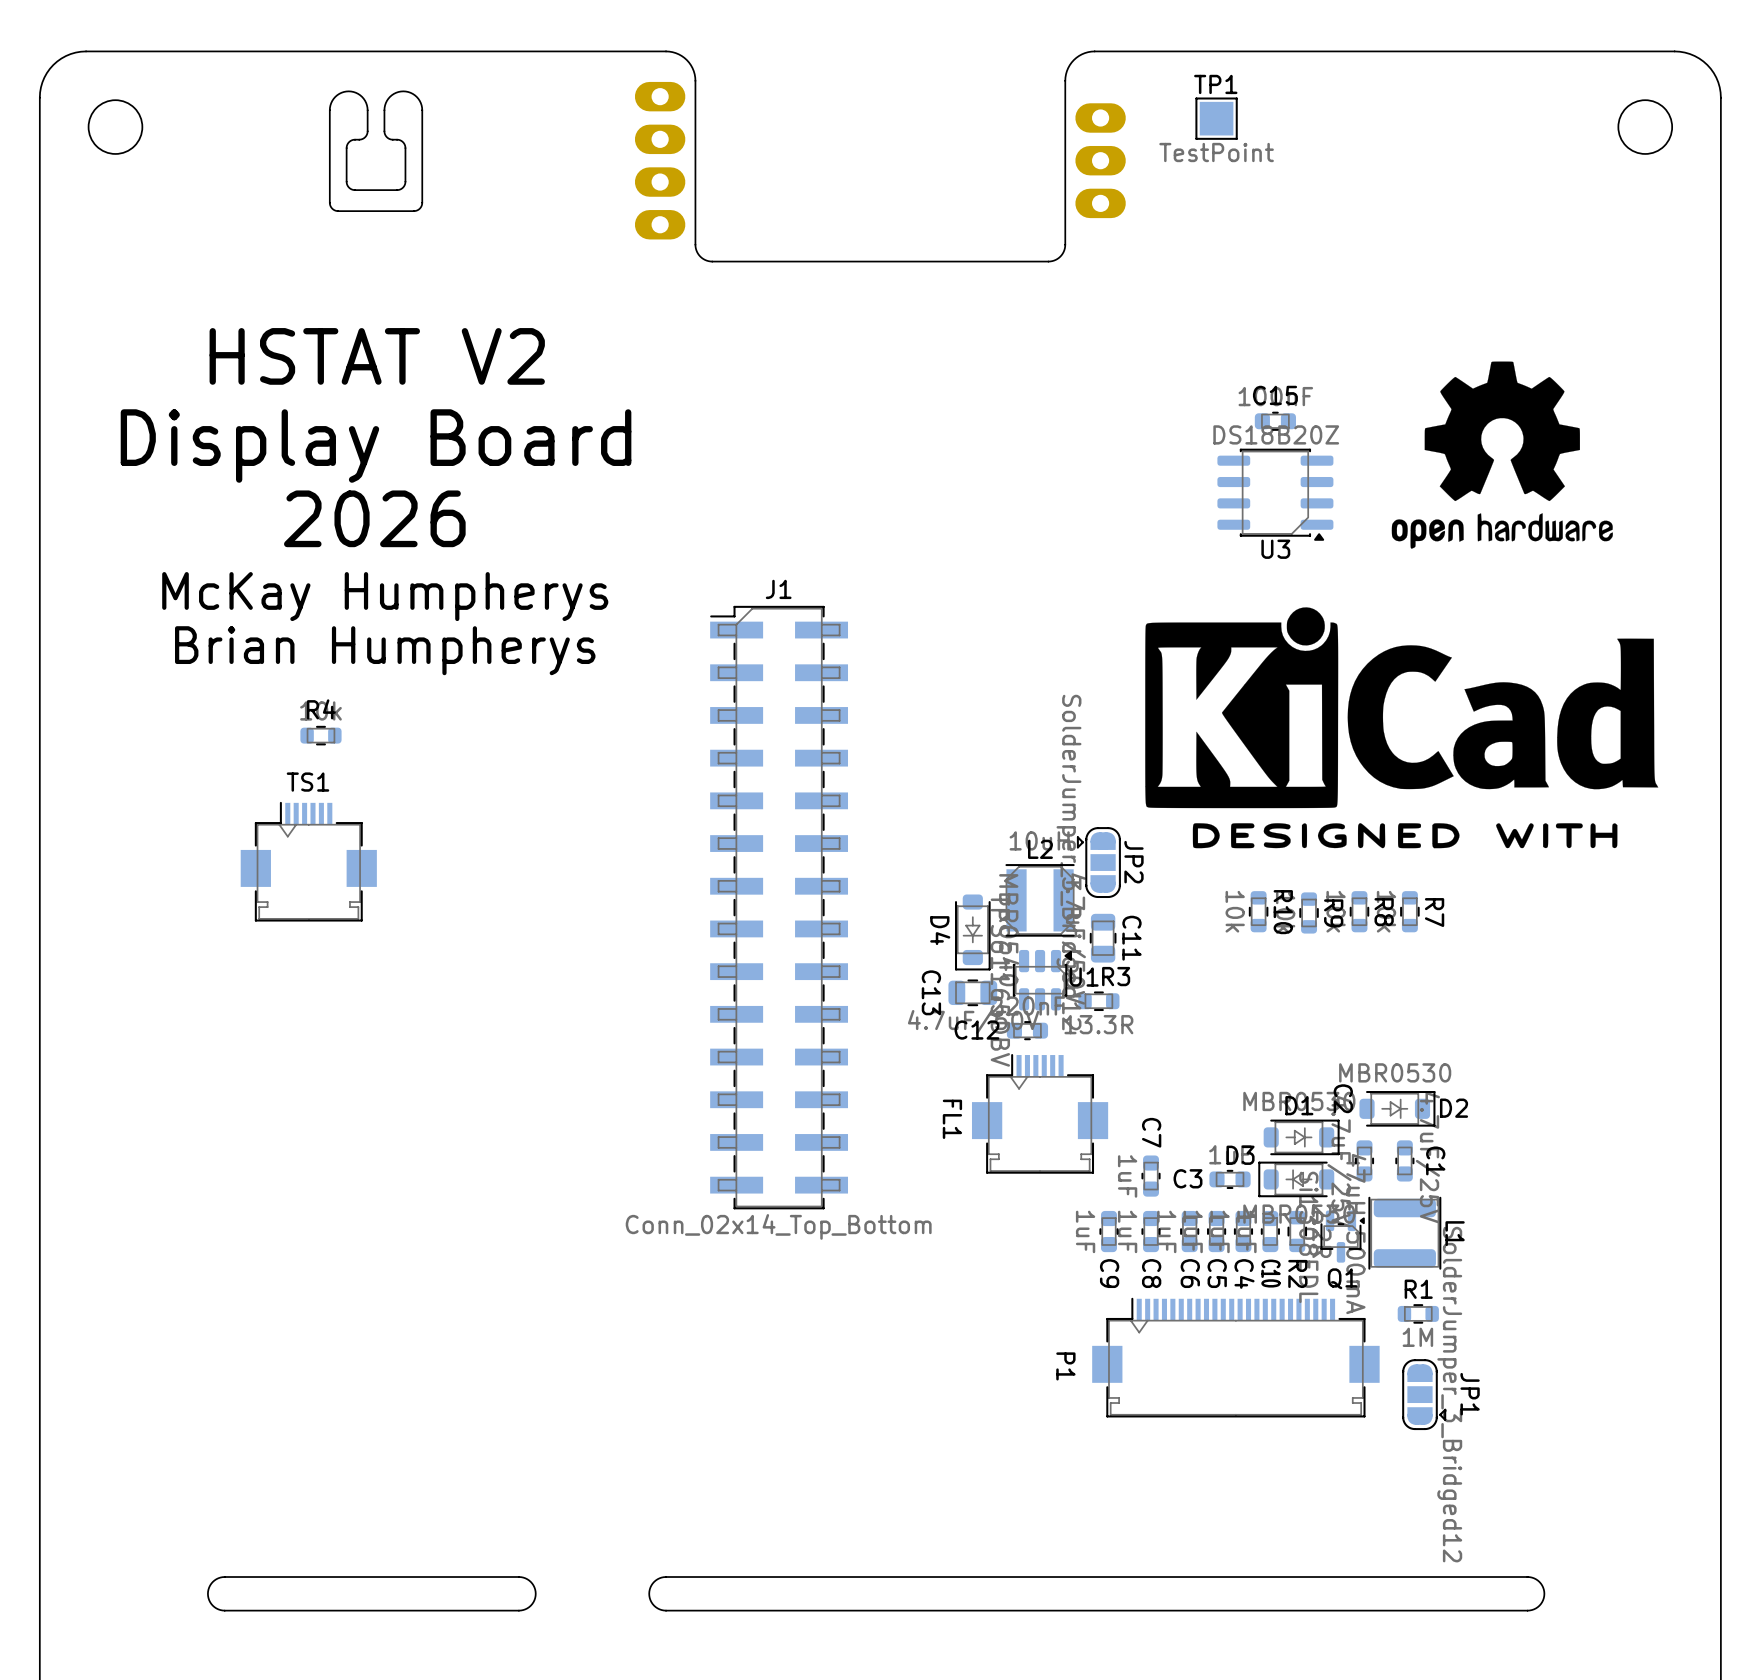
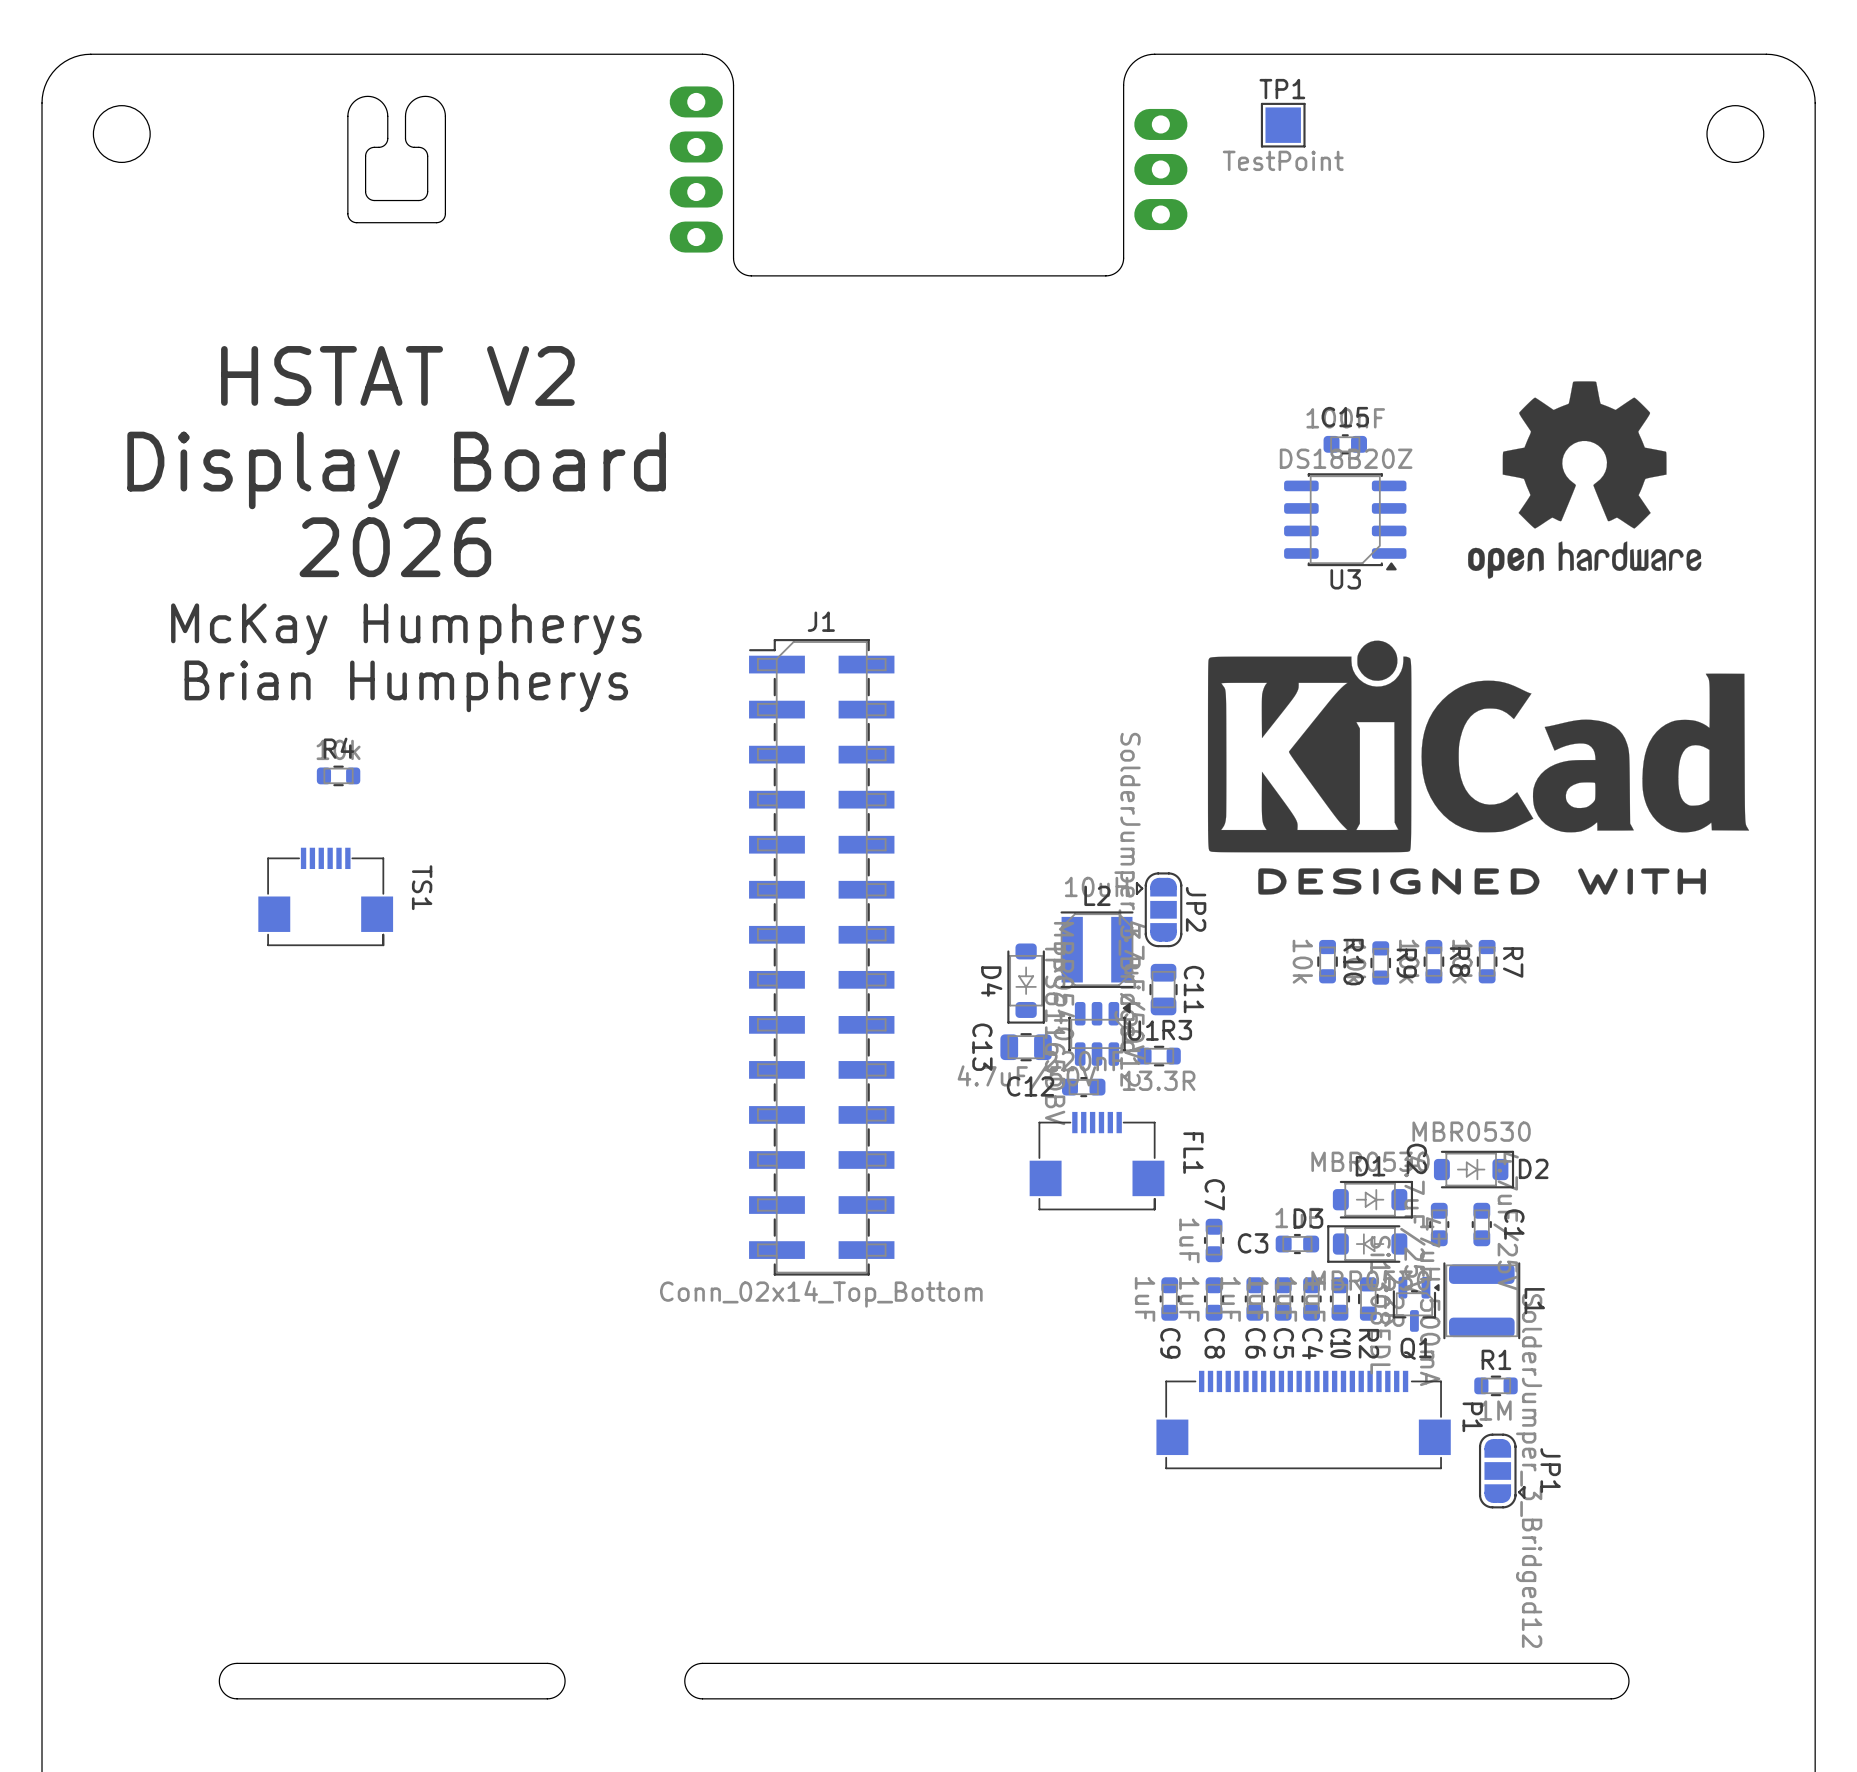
TS1 name position: TS1 (307, 782) -> TS1 (422, 887)
TS1 footprint: [240, 801, 377, 922] -> [258, 847, 394, 947]
FL1 footprint: [971, 1054, 1109, 1174] -> [1029, 1111, 1165, 1211]
FL1 name position: FL1 (952, 1119) -> FL1 (1193, 1153)
P1 footprint: [1092, 1297, 1380, 1418] -> [1156, 1370, 1451, 1470]
P1 name position: P1 (1065, 1366) -> P1 (1472, 1417)

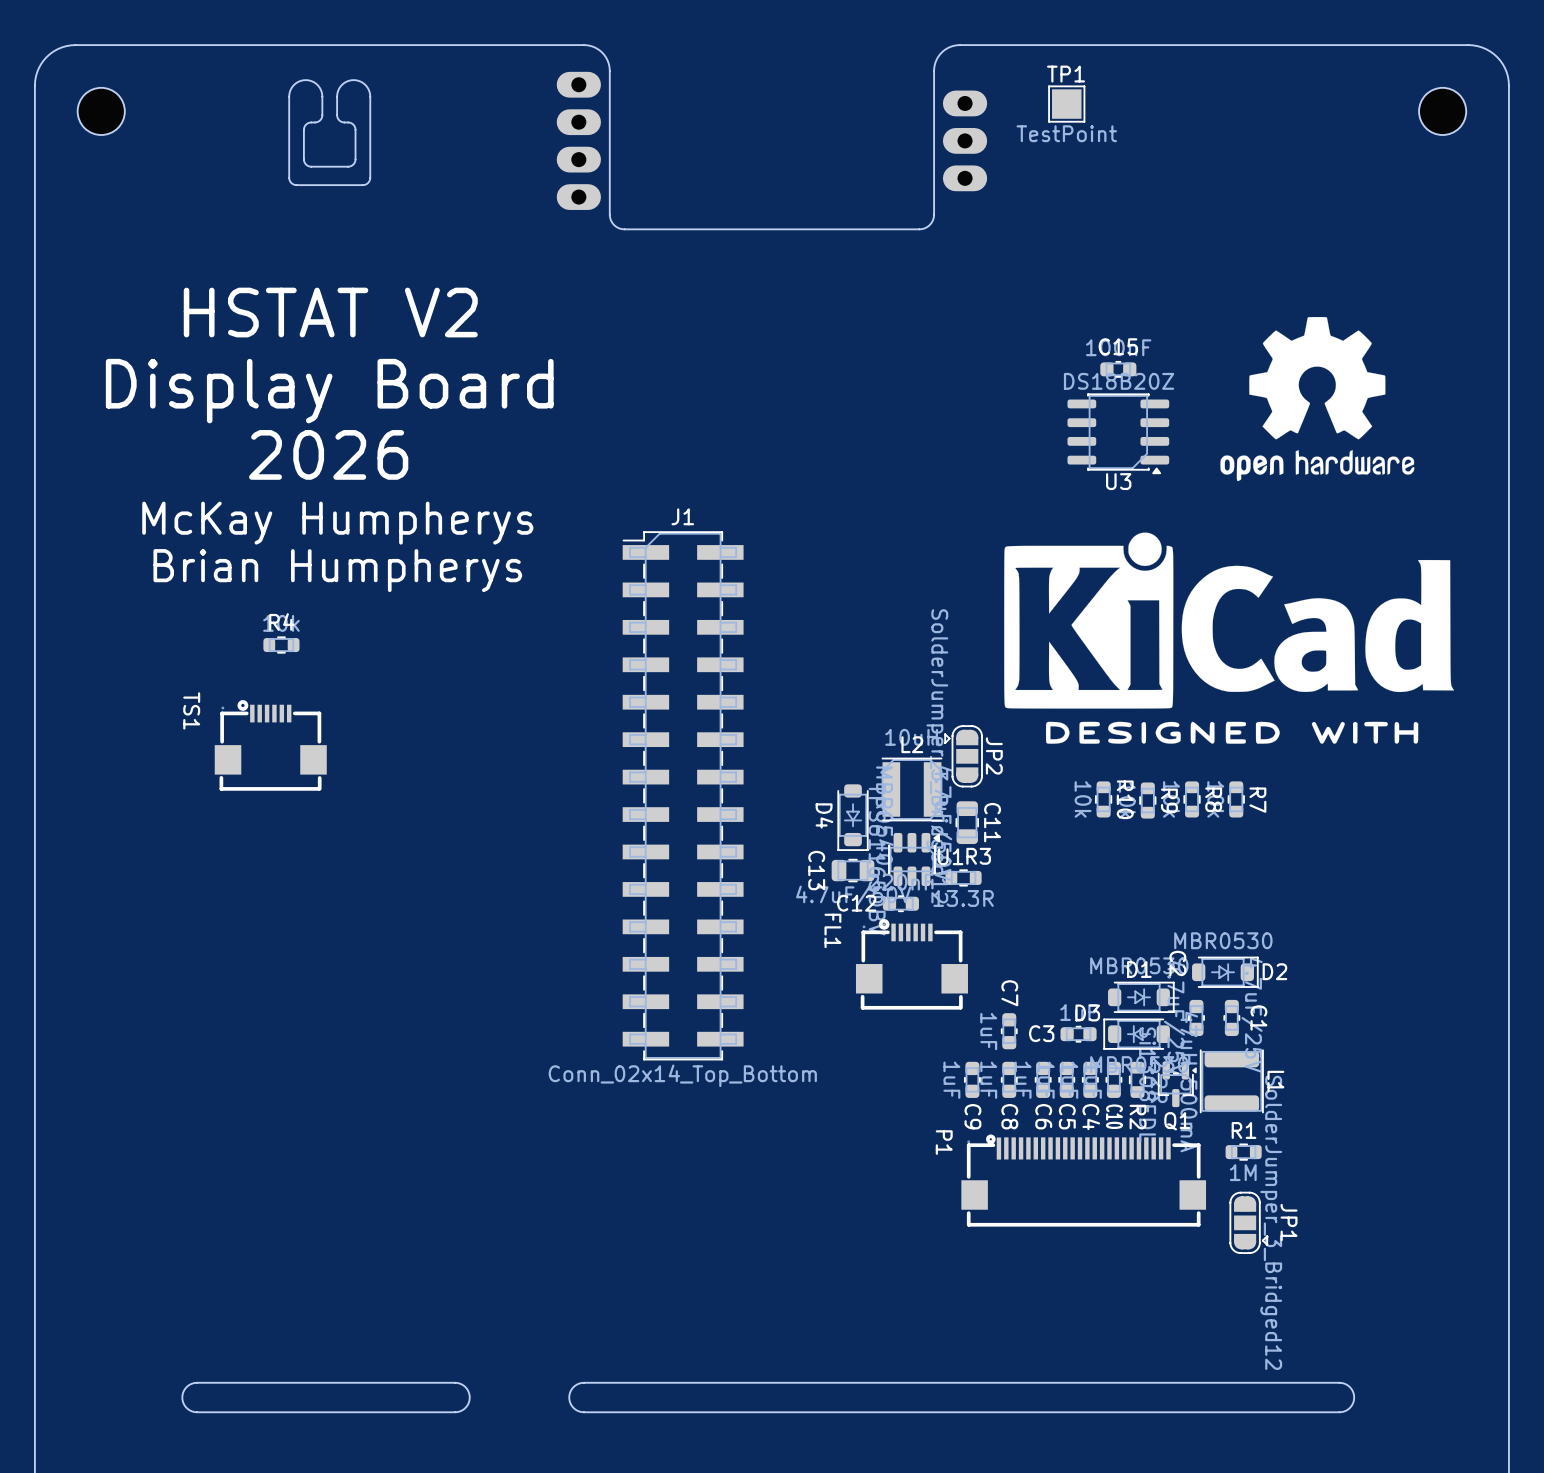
TS1 footprint: [258, 847, 394, 947] -> [214, 700, 327, 791]
TS1 name position: TS1 (422, 887) -> TS1 (191, 710)
FL1 footprint: [1029, 1111, 1165, 1211] -> [855, 918, 968, 1010]
FL1 name position: FL1 (1193, 1153) -> FL1 (832, 930)
P1 footprint: [1156, 1370, 1451, 1470] -> [961, 1134, 1207, 1227]
P1 name position: P1 (1472, 1417) -> P1 (944, 1142)

